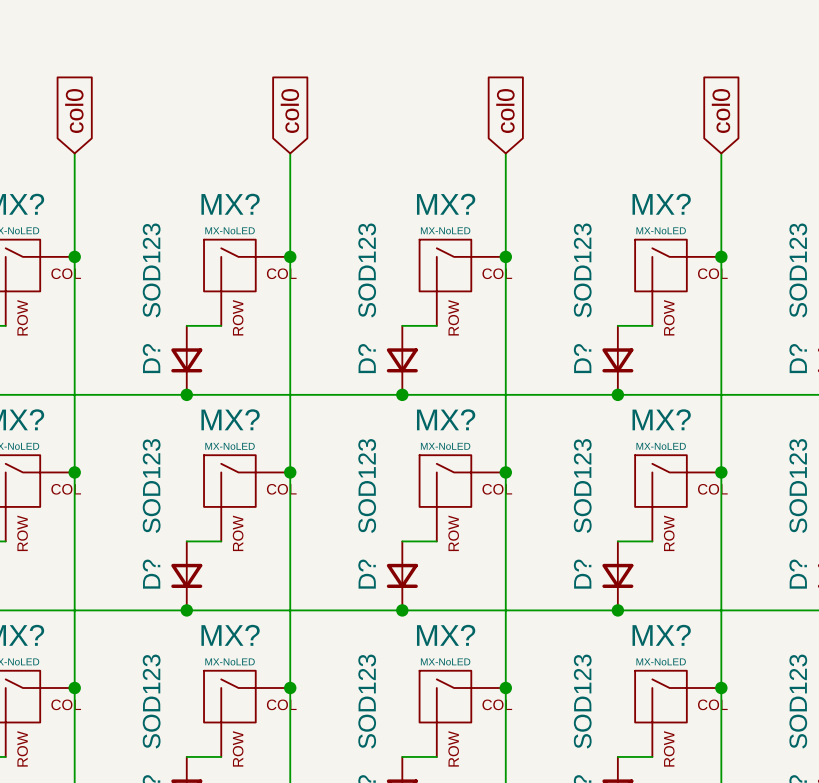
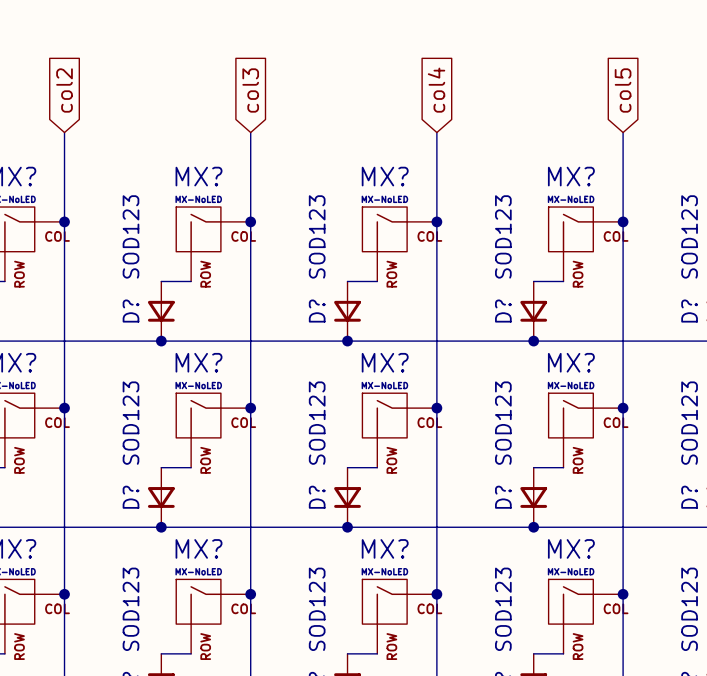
global label: col0 (74, 111) -> col2 (64, 90)
global label: col0 (289, 111) -> col3 (250, 90)
global label: col0 (505, 111) -> col4 (436, 90)
global label: col0 (720, 111) -> col5 (623, 90)

